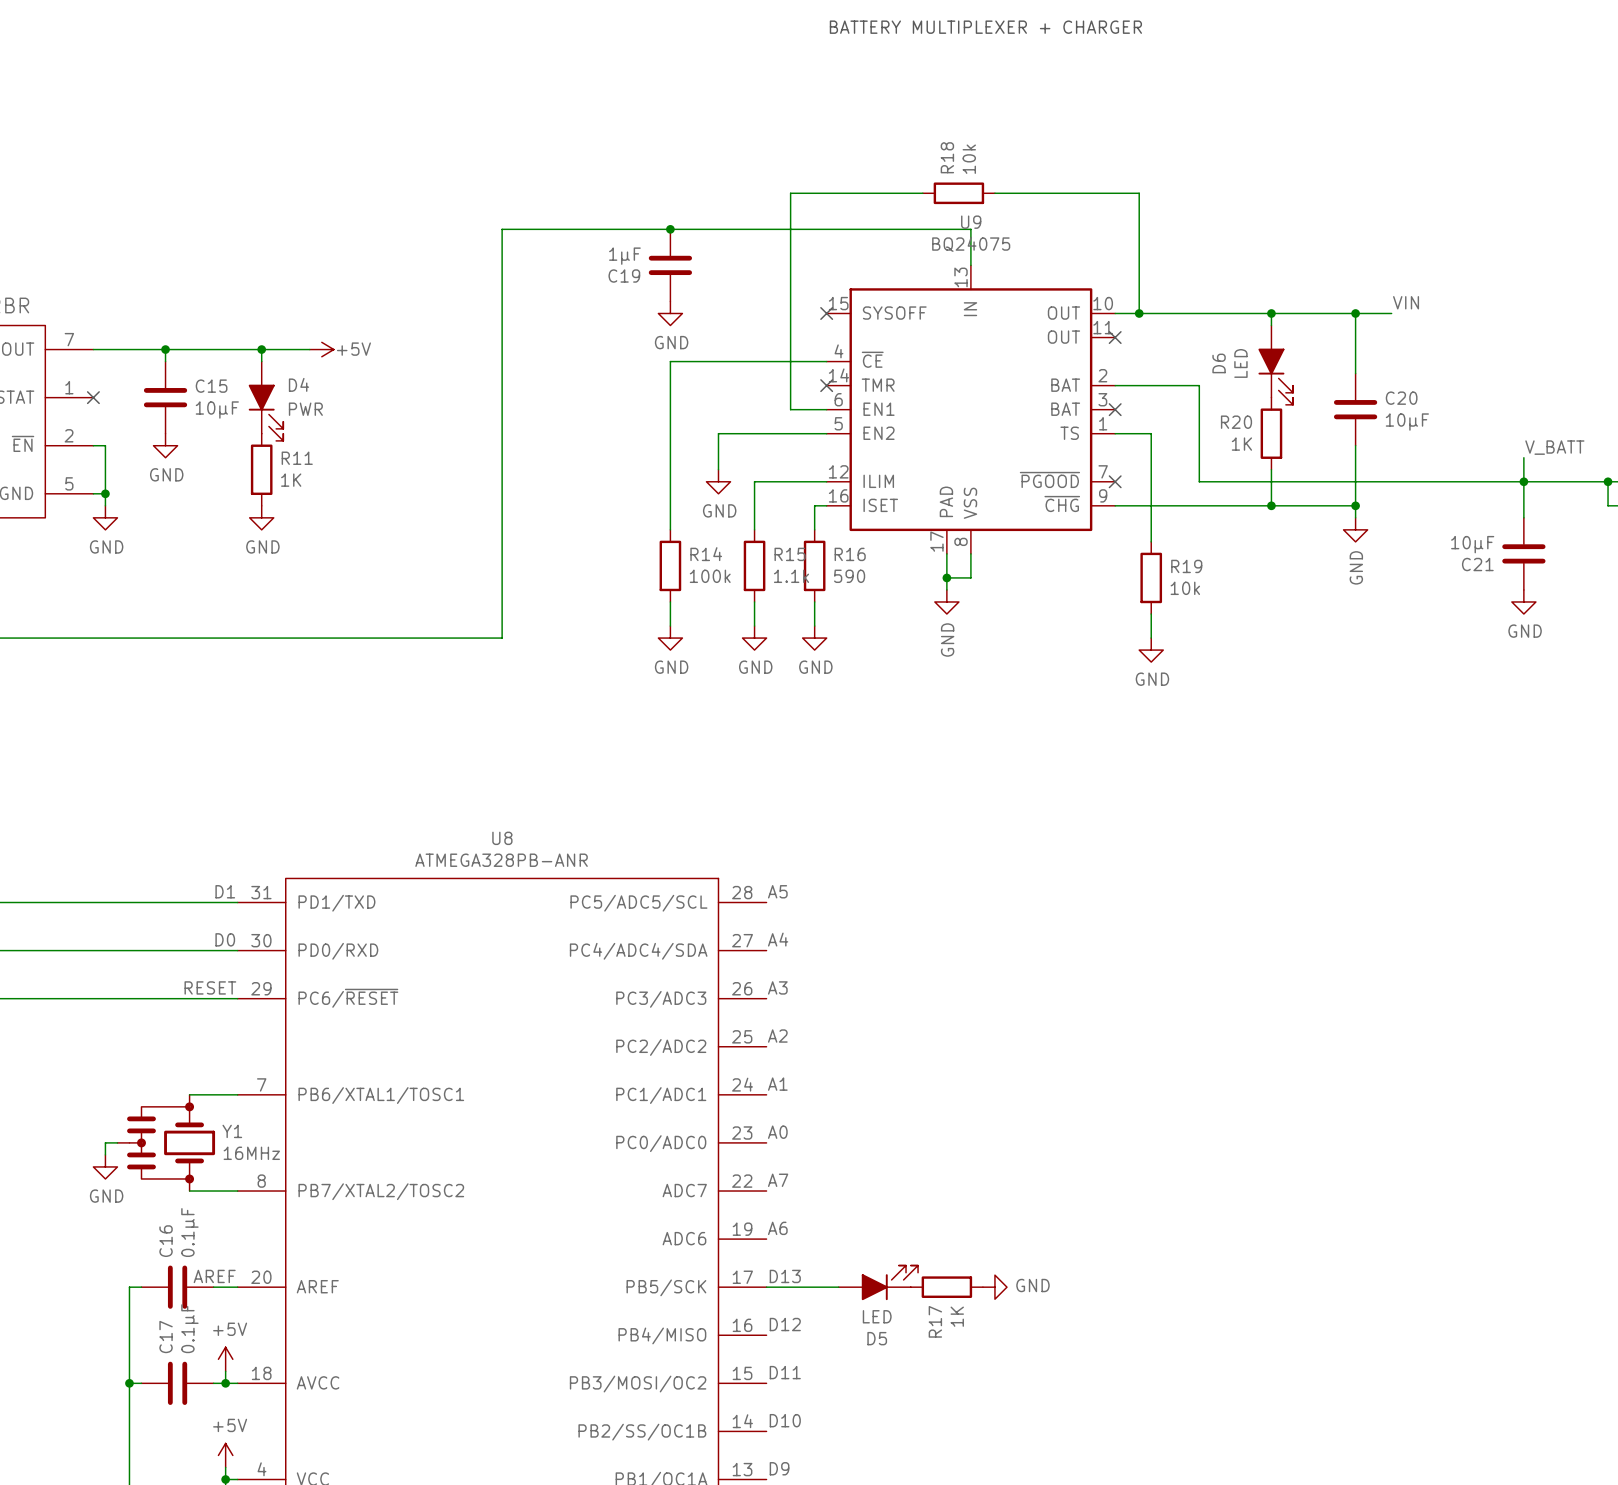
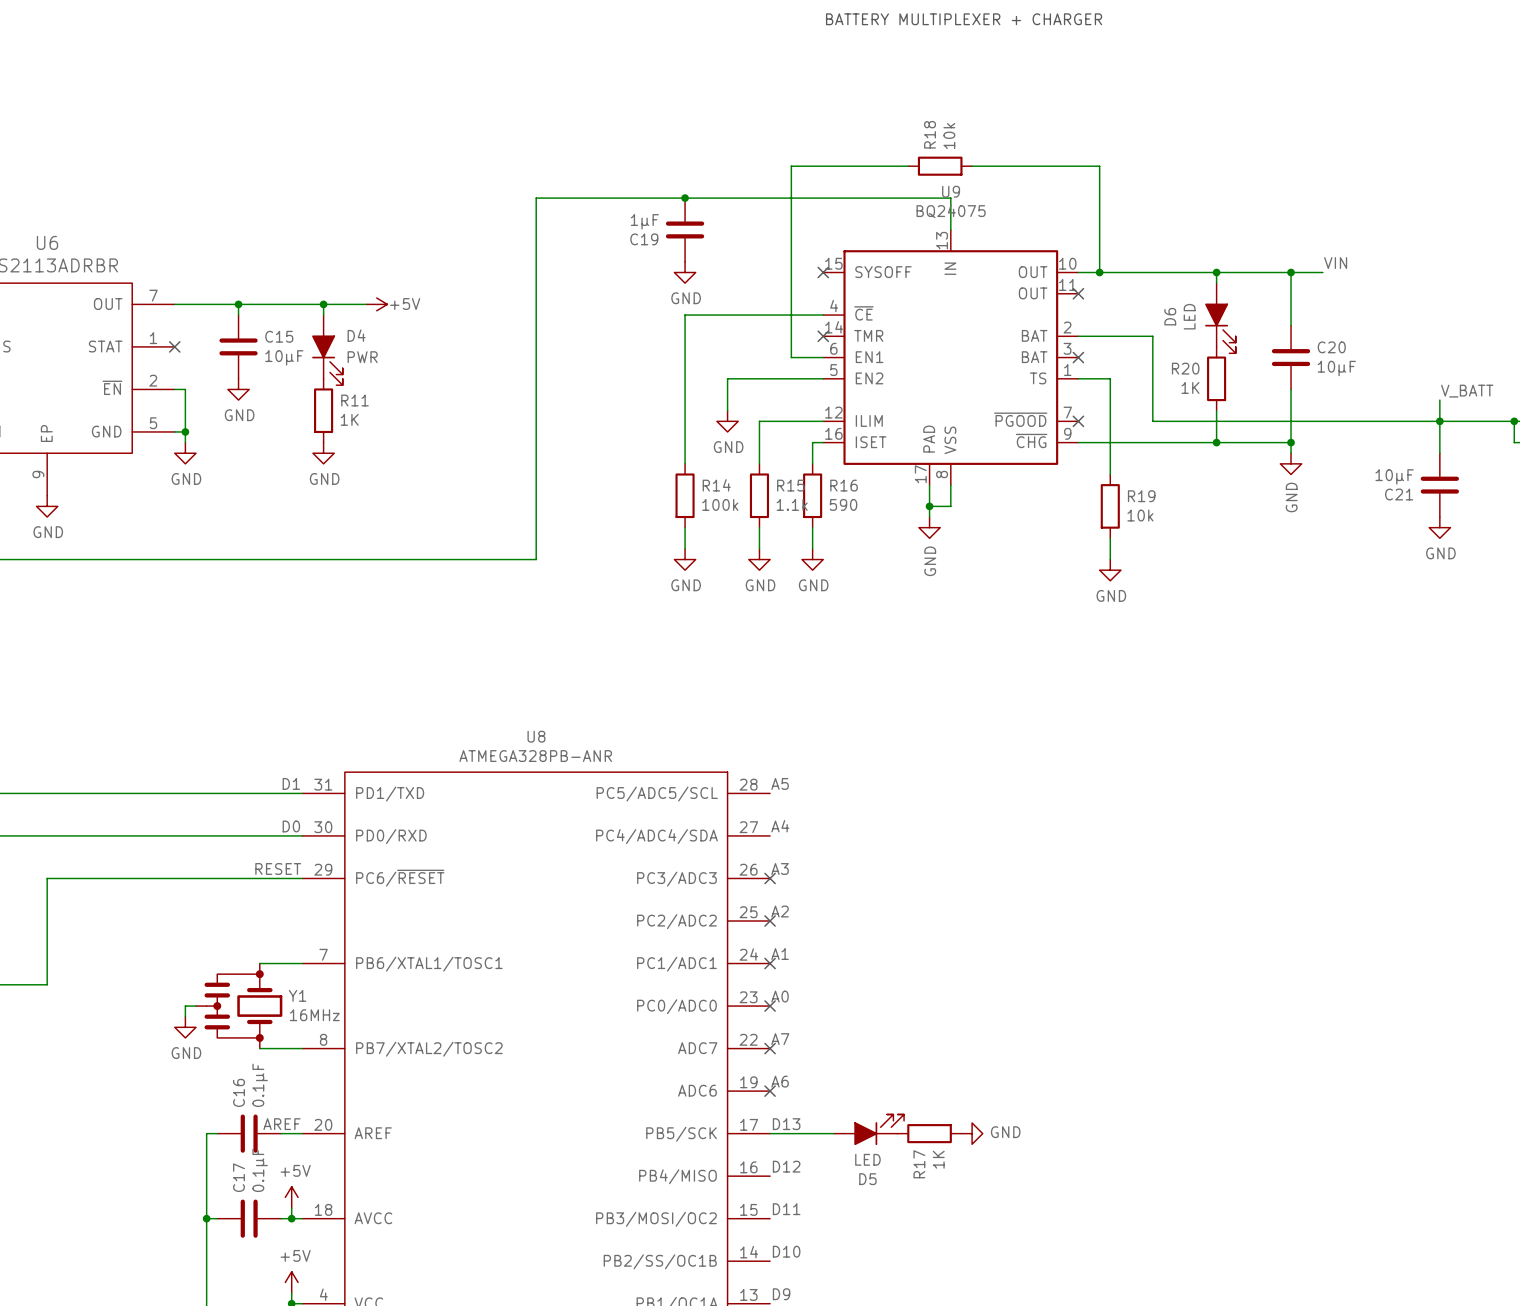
no-connect mark: none -> (770, 878)
no-connect mark: none -> (770, 921)
no-connect mark: none -> (770, 963)
no-connect mark: none -> (770, 1006)
no-connect mark: none -> (770, 1048)
no-connect mark: none -> (770, 1091)

